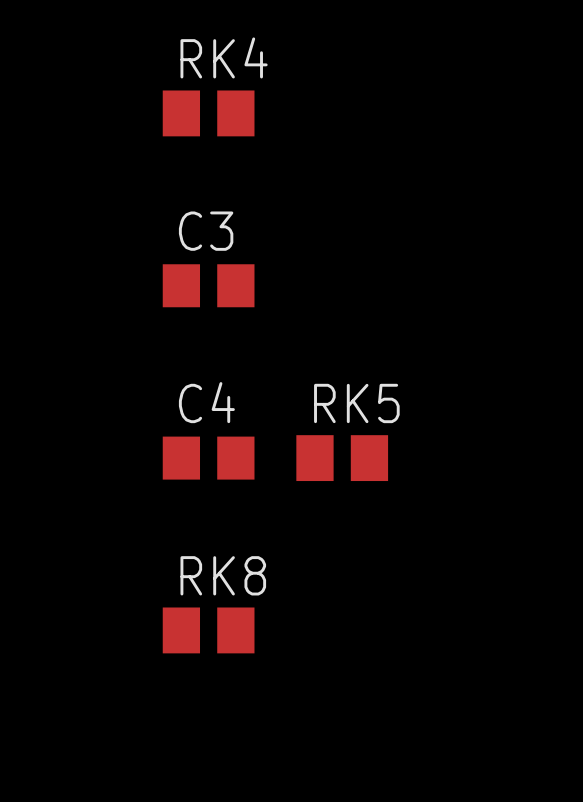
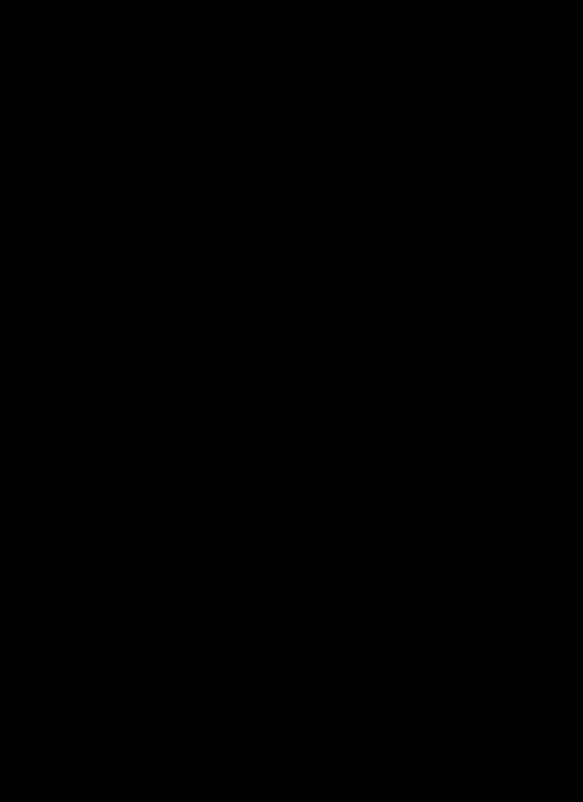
RK4: (208, 113) -> none
C3: (208, 285) -> none
C4: (208, 458) -> none
RK5: (342, 458) -> none
RK8: (208, 630) -> none

